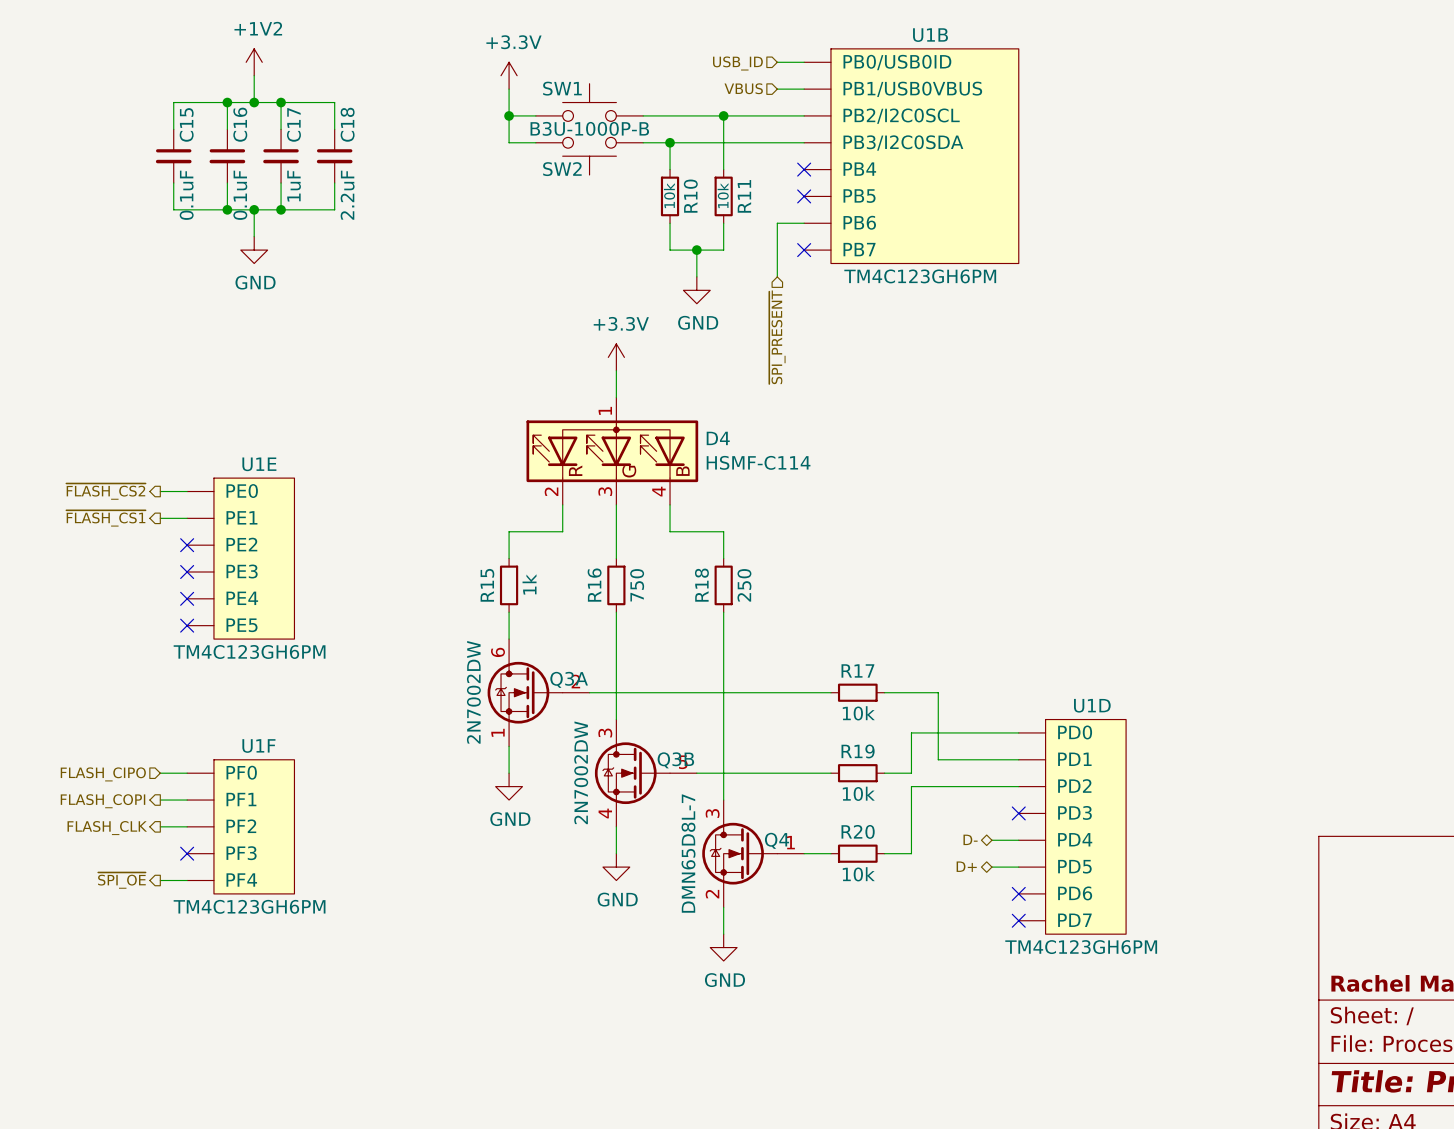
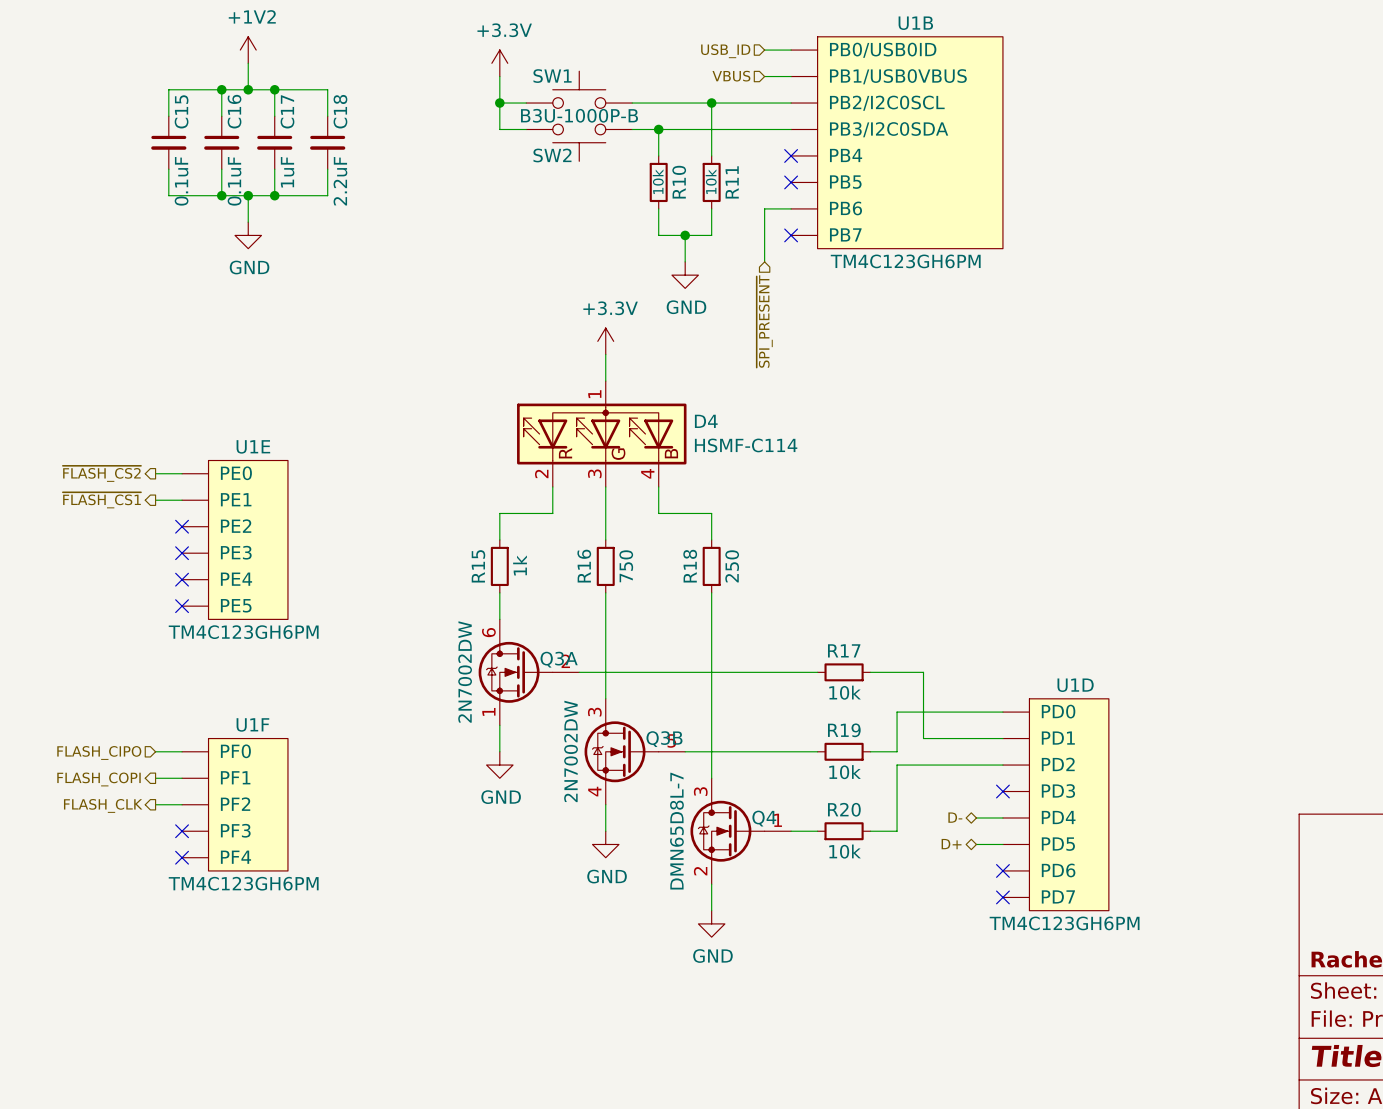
hierarchical label: ~{SPI_OE} (121, 880) -> none
wire: (160, 880) (187, 880) -> none
no-connect mark: none -> (182, 857)

